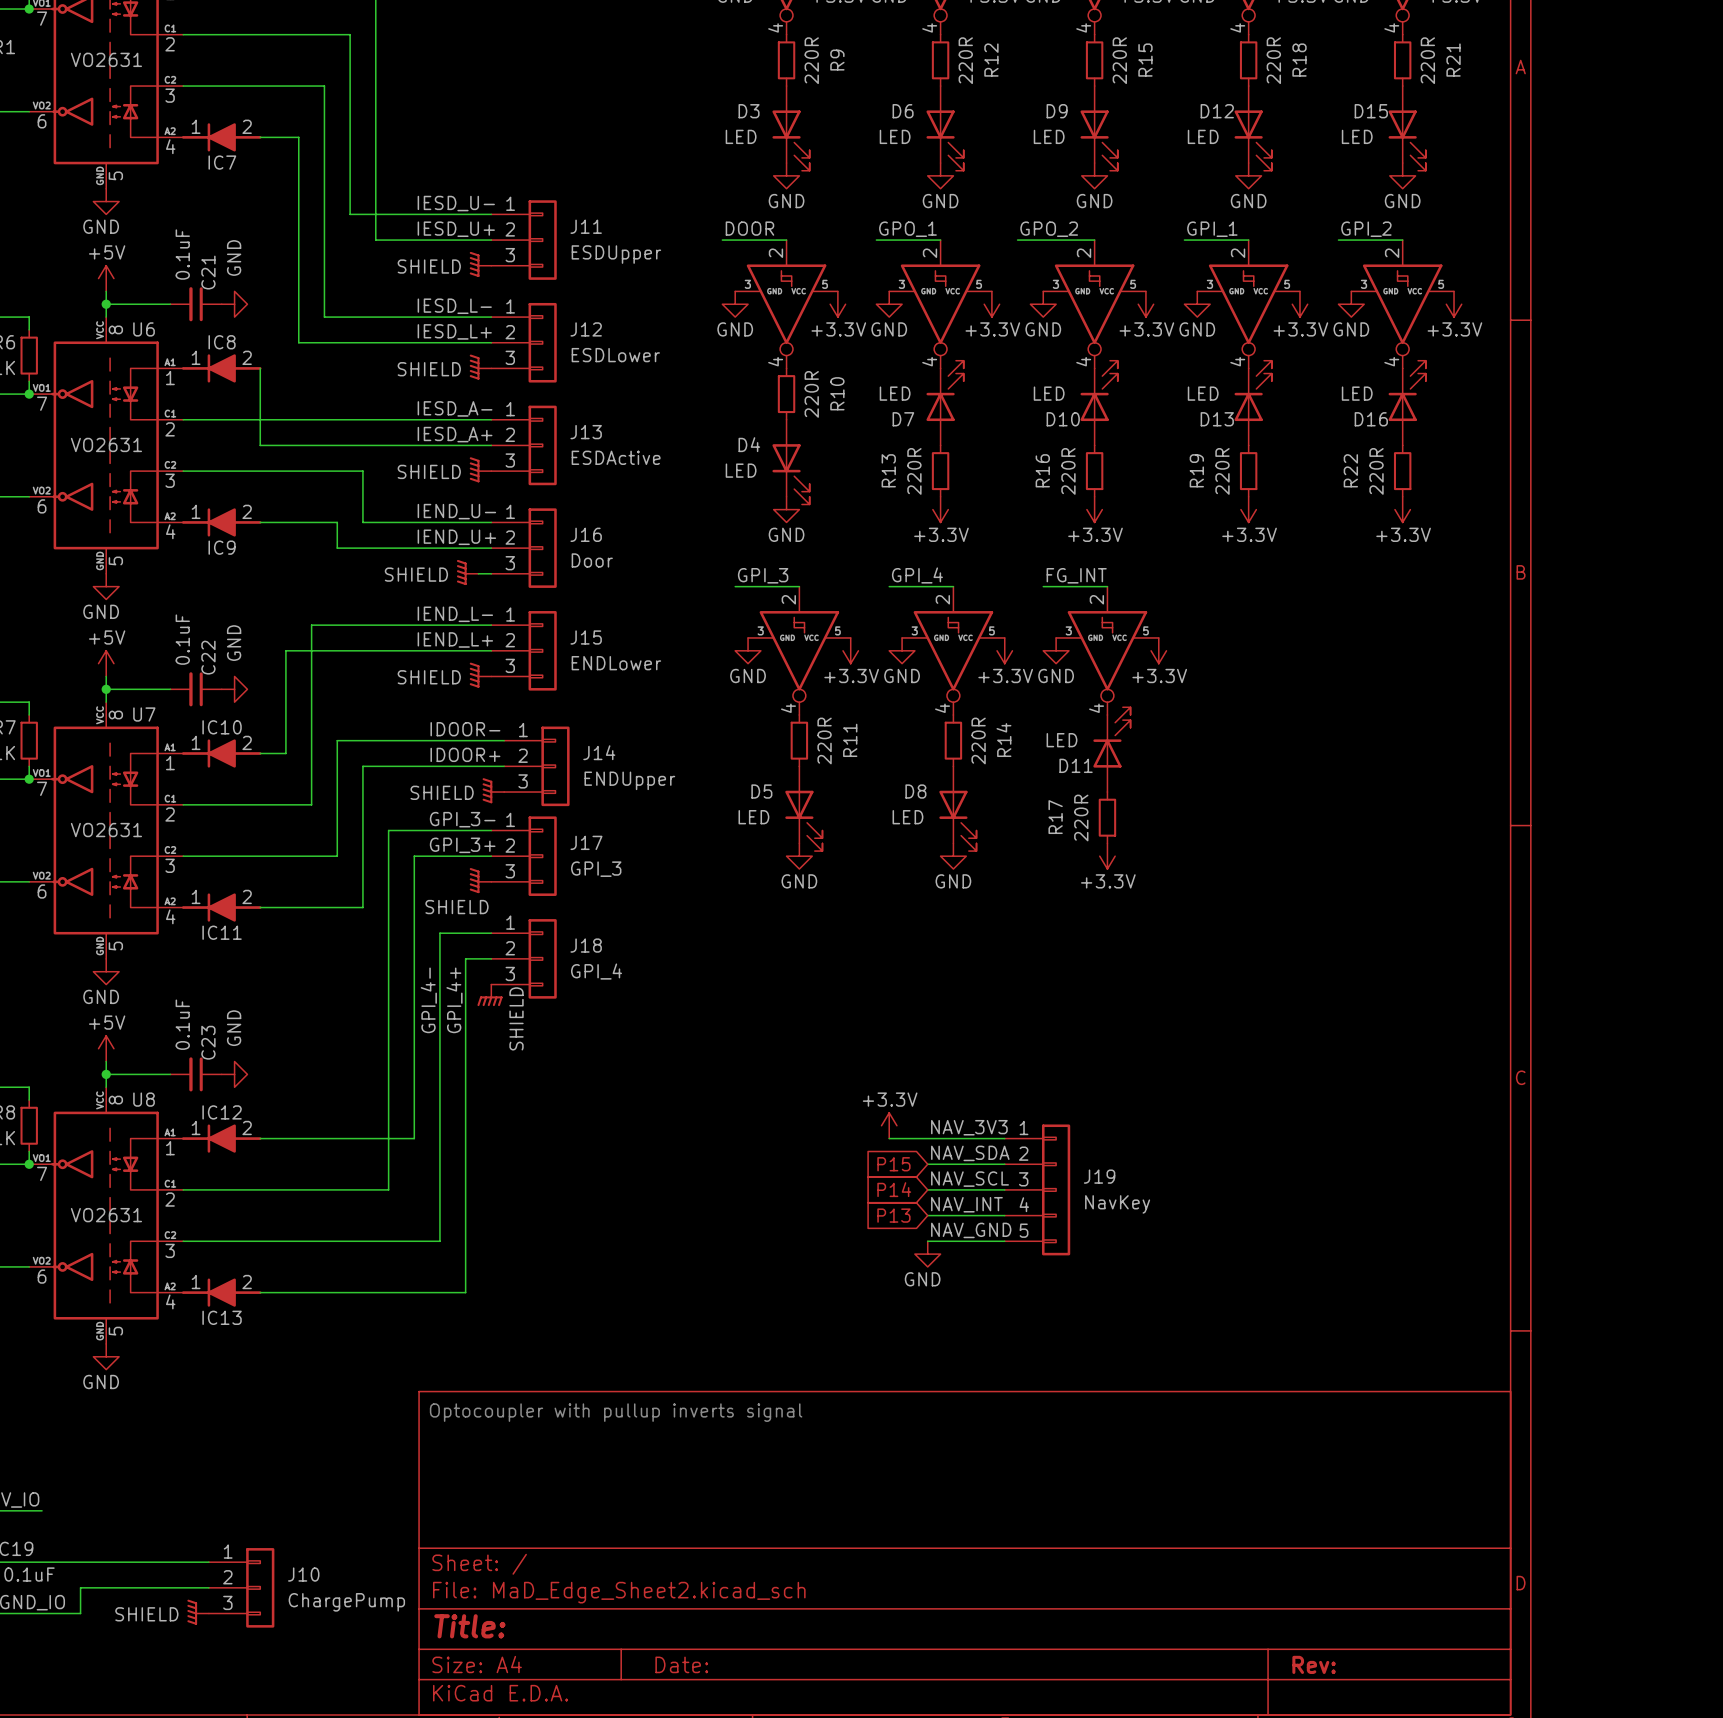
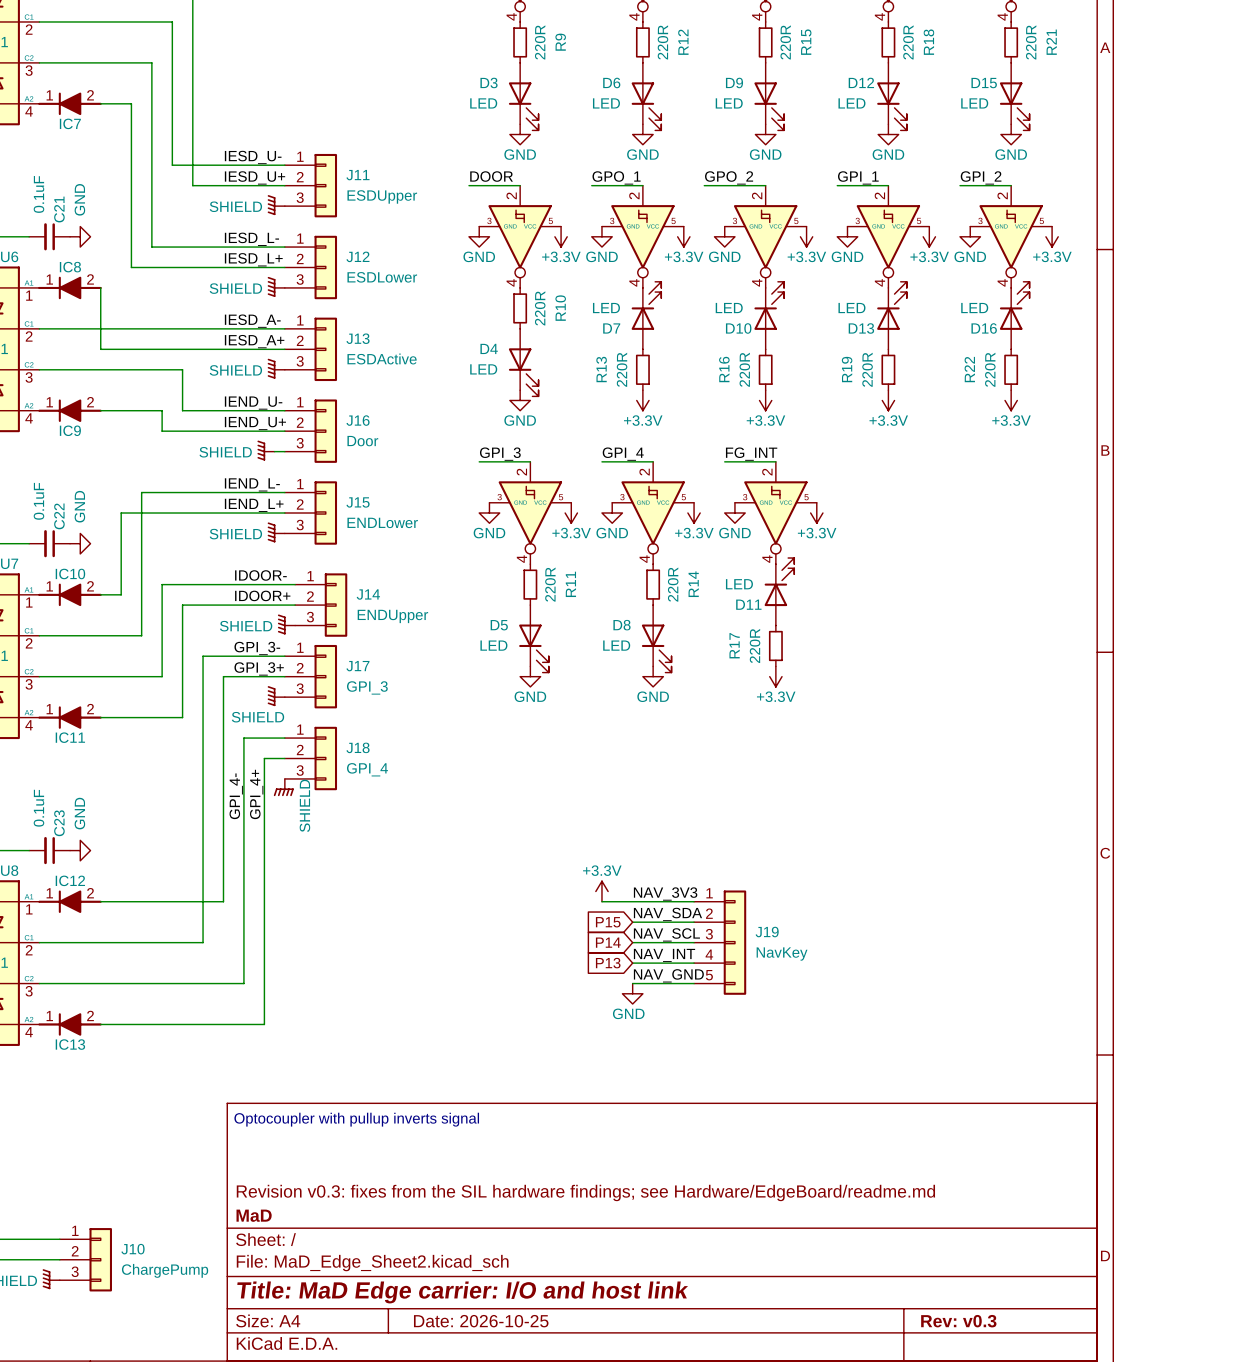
title block: none -> Revision v0.3: fixes from the SIL hardware findings; see Hardware/EdgeBoard/readme.md (585, 1192)
title block: none -> MaD (254, 1215)
title block: Title: (469, 1626) -> Title: MaD Edge carrier: I/O and host link (462, 1292)
title block: Date: (681, 1664) -> Date: 2026-10-25 (481, 1321)
title block: Rev: (1314, 1664) -> Rev: v0.3 (958, 1321)

